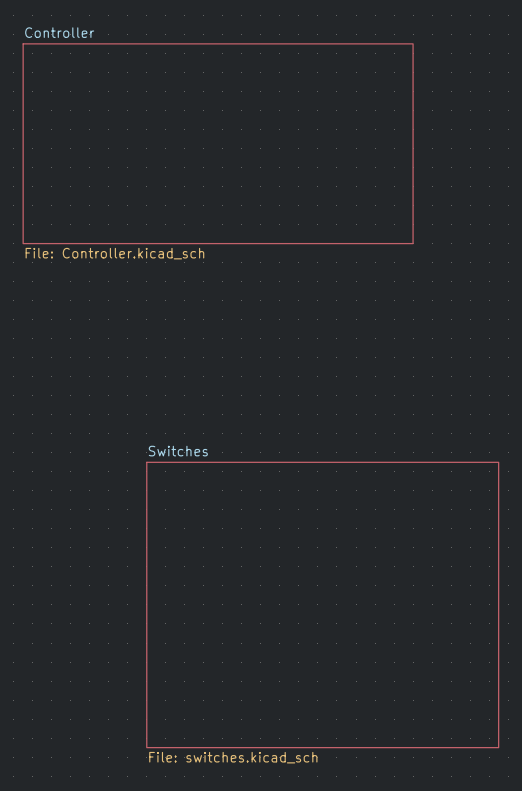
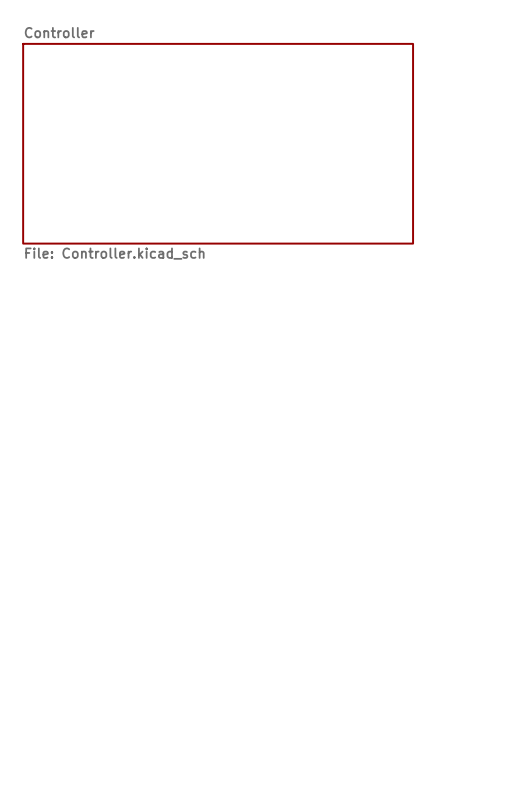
sheet Switches: File: switches.kicad_sch (322, 604) -> none

